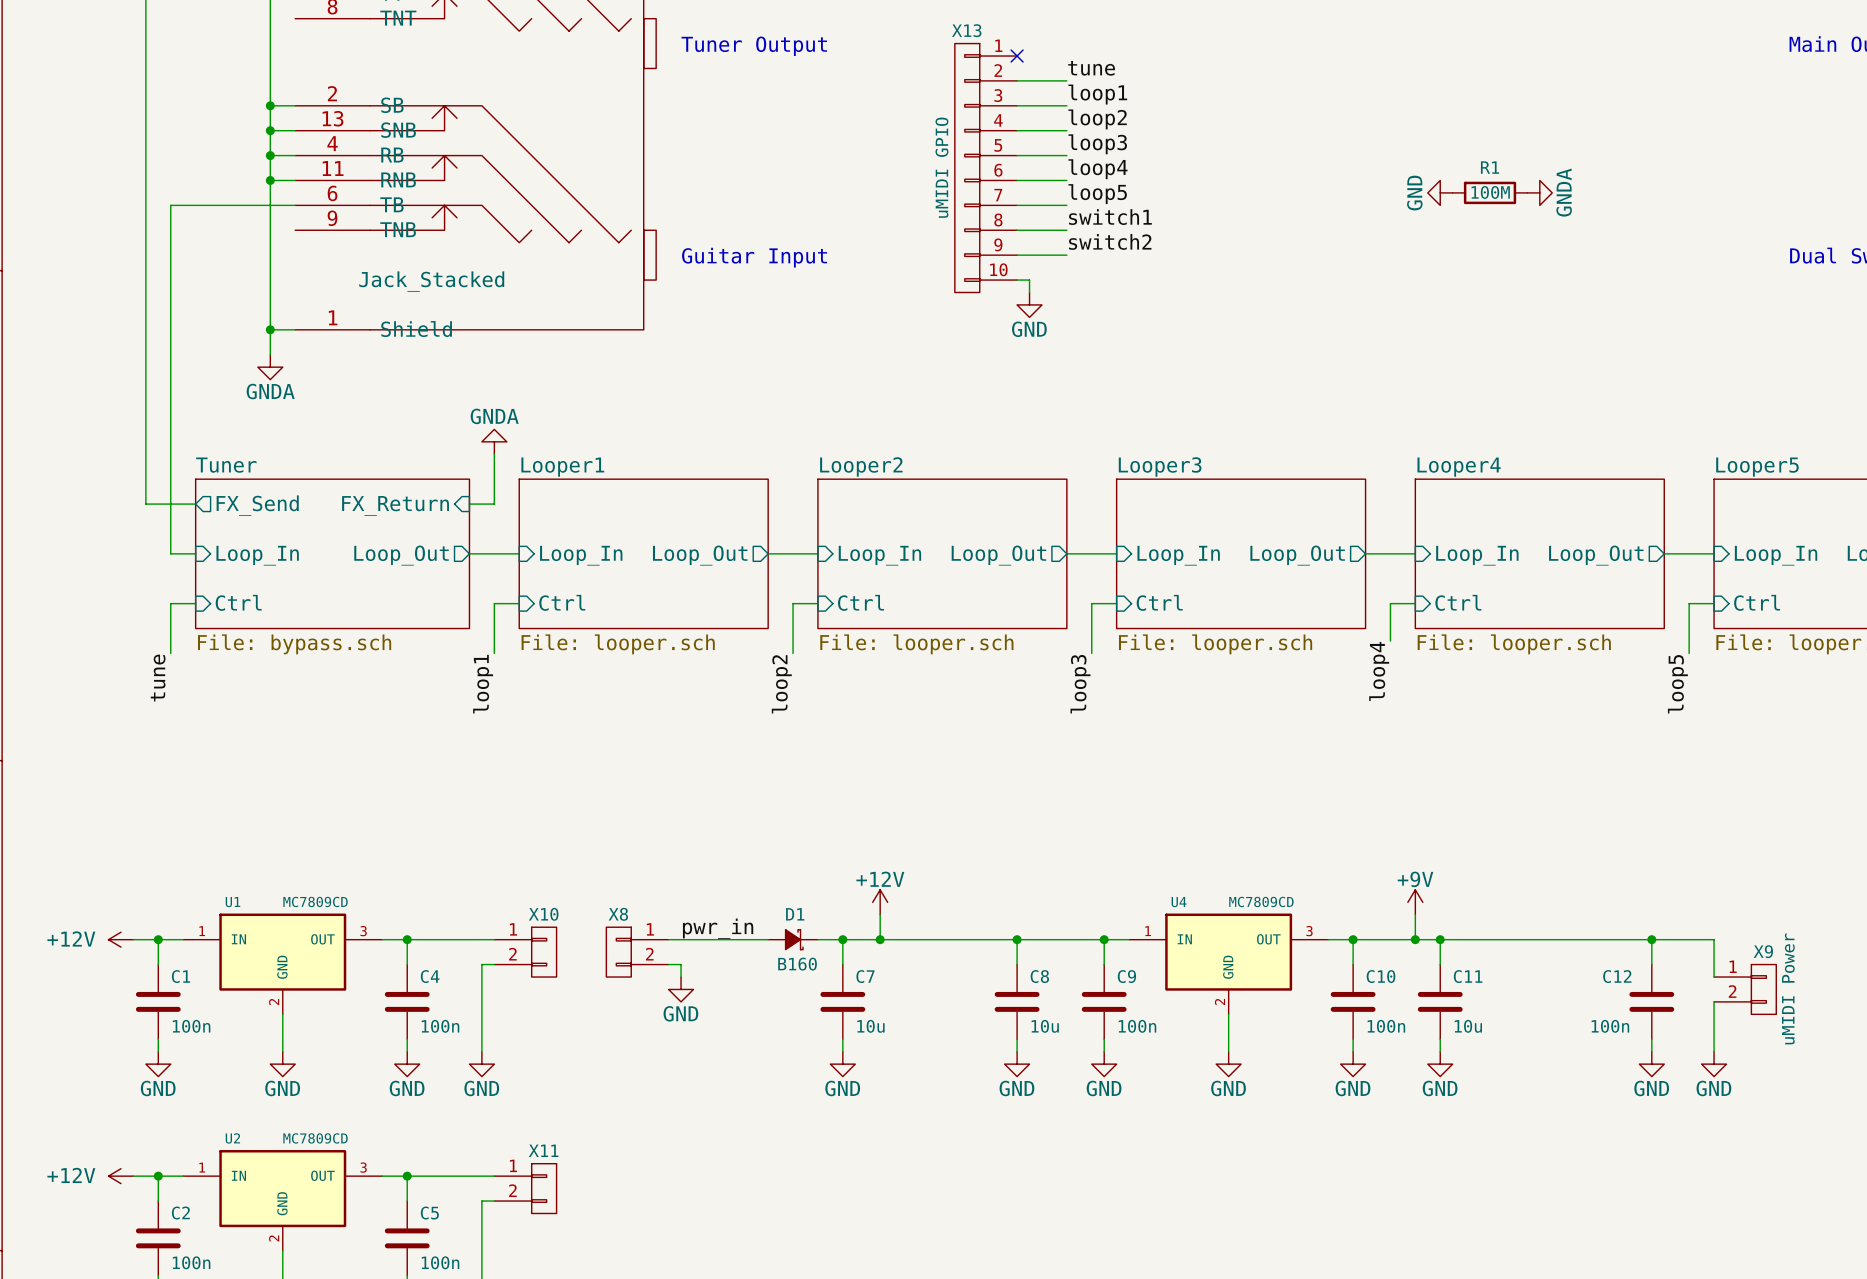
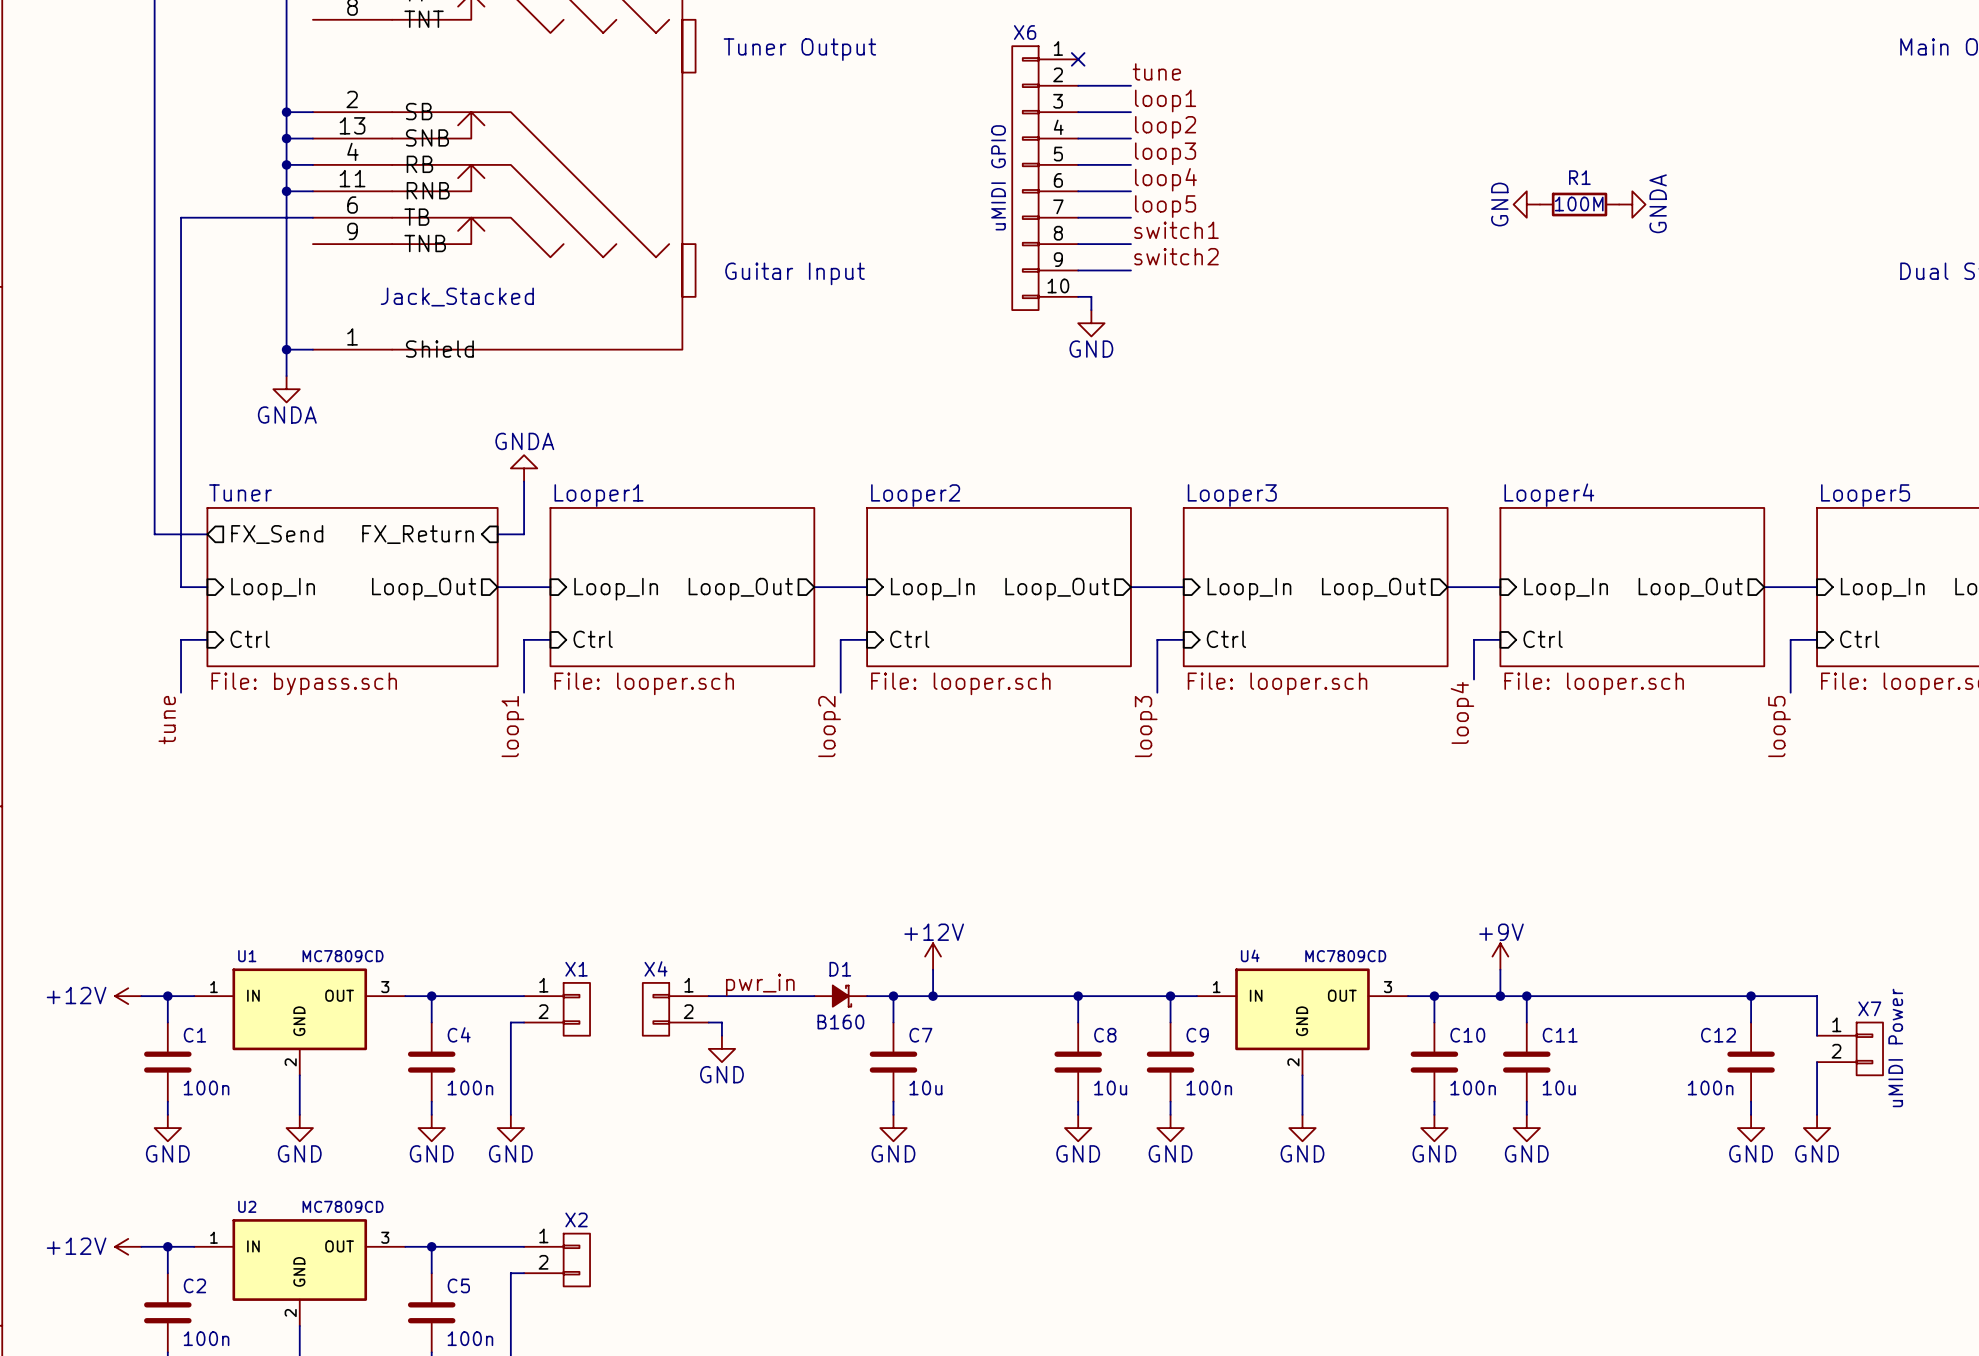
X13 name: X13 (966, 30) -> X6 (1025, 32)
X10 name: X10 (543, 914) -> X1 (576, 969)
X8 name: X8 (618, 914) -> X4 (655, 968)
X9 name: X9 (1763, 951) -> X7 (1869, 1008)
X11 name: X11 (543, 1150) -> X2 (576, 1219)

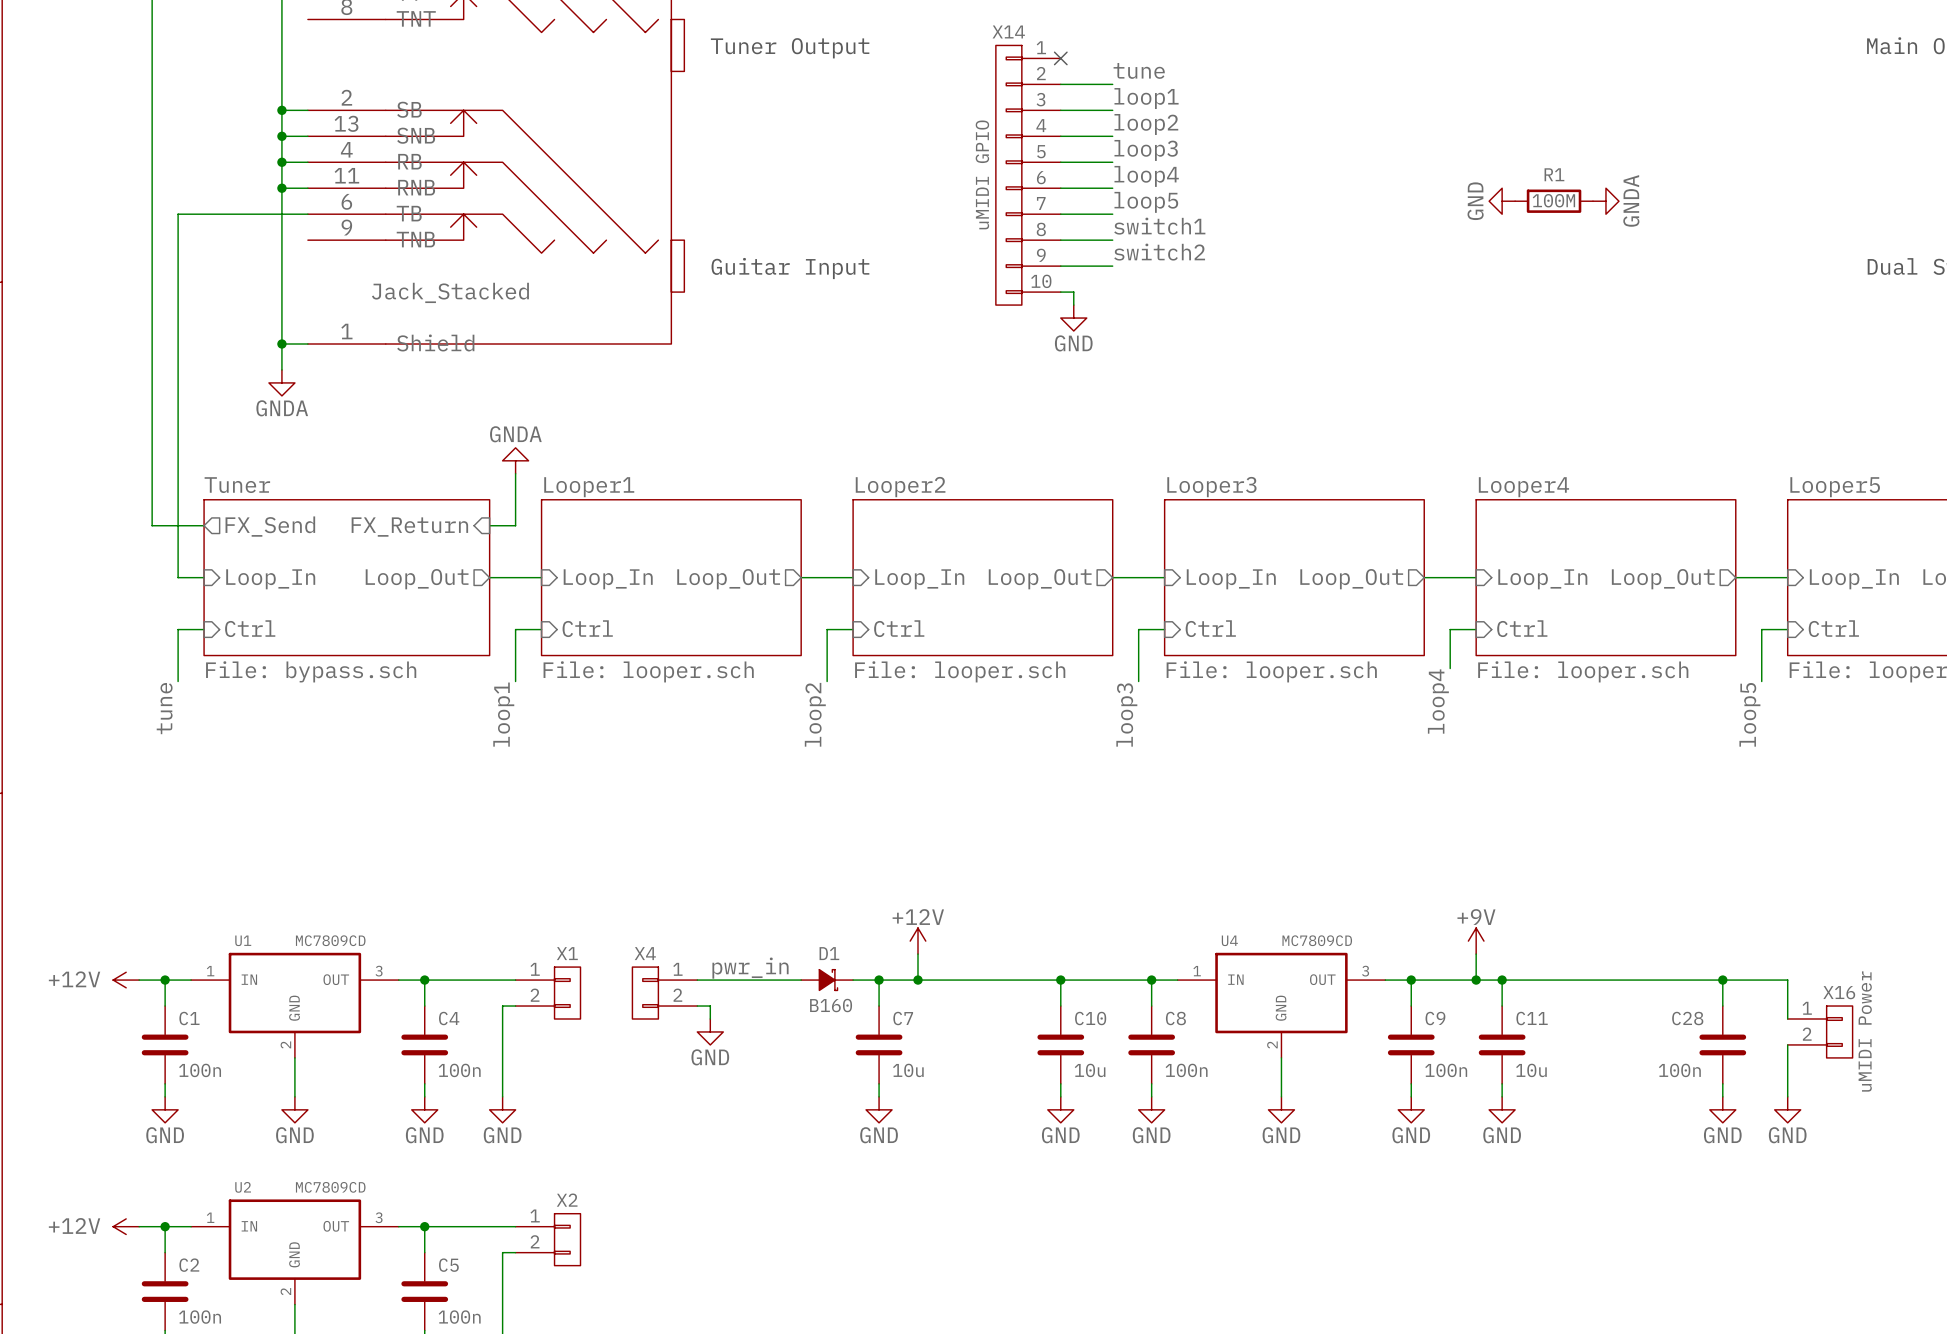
X6 name: X6 (1025, 32) -> X14 (1008, 31)
X7 name: X7 (1869, 1008) -> X16 (1839, 992)
C8 name: C8 (1105, 1035) -> C10 (1090, 1018)
C9 name: C9 (1197, 1035) -> C8 (1175, 1018)
C10 name: C10 (1467, 1035) -> C9 (1435, 1018)
C12 name: C12 (1718, 1035) -> C28 (1687, 1018)

